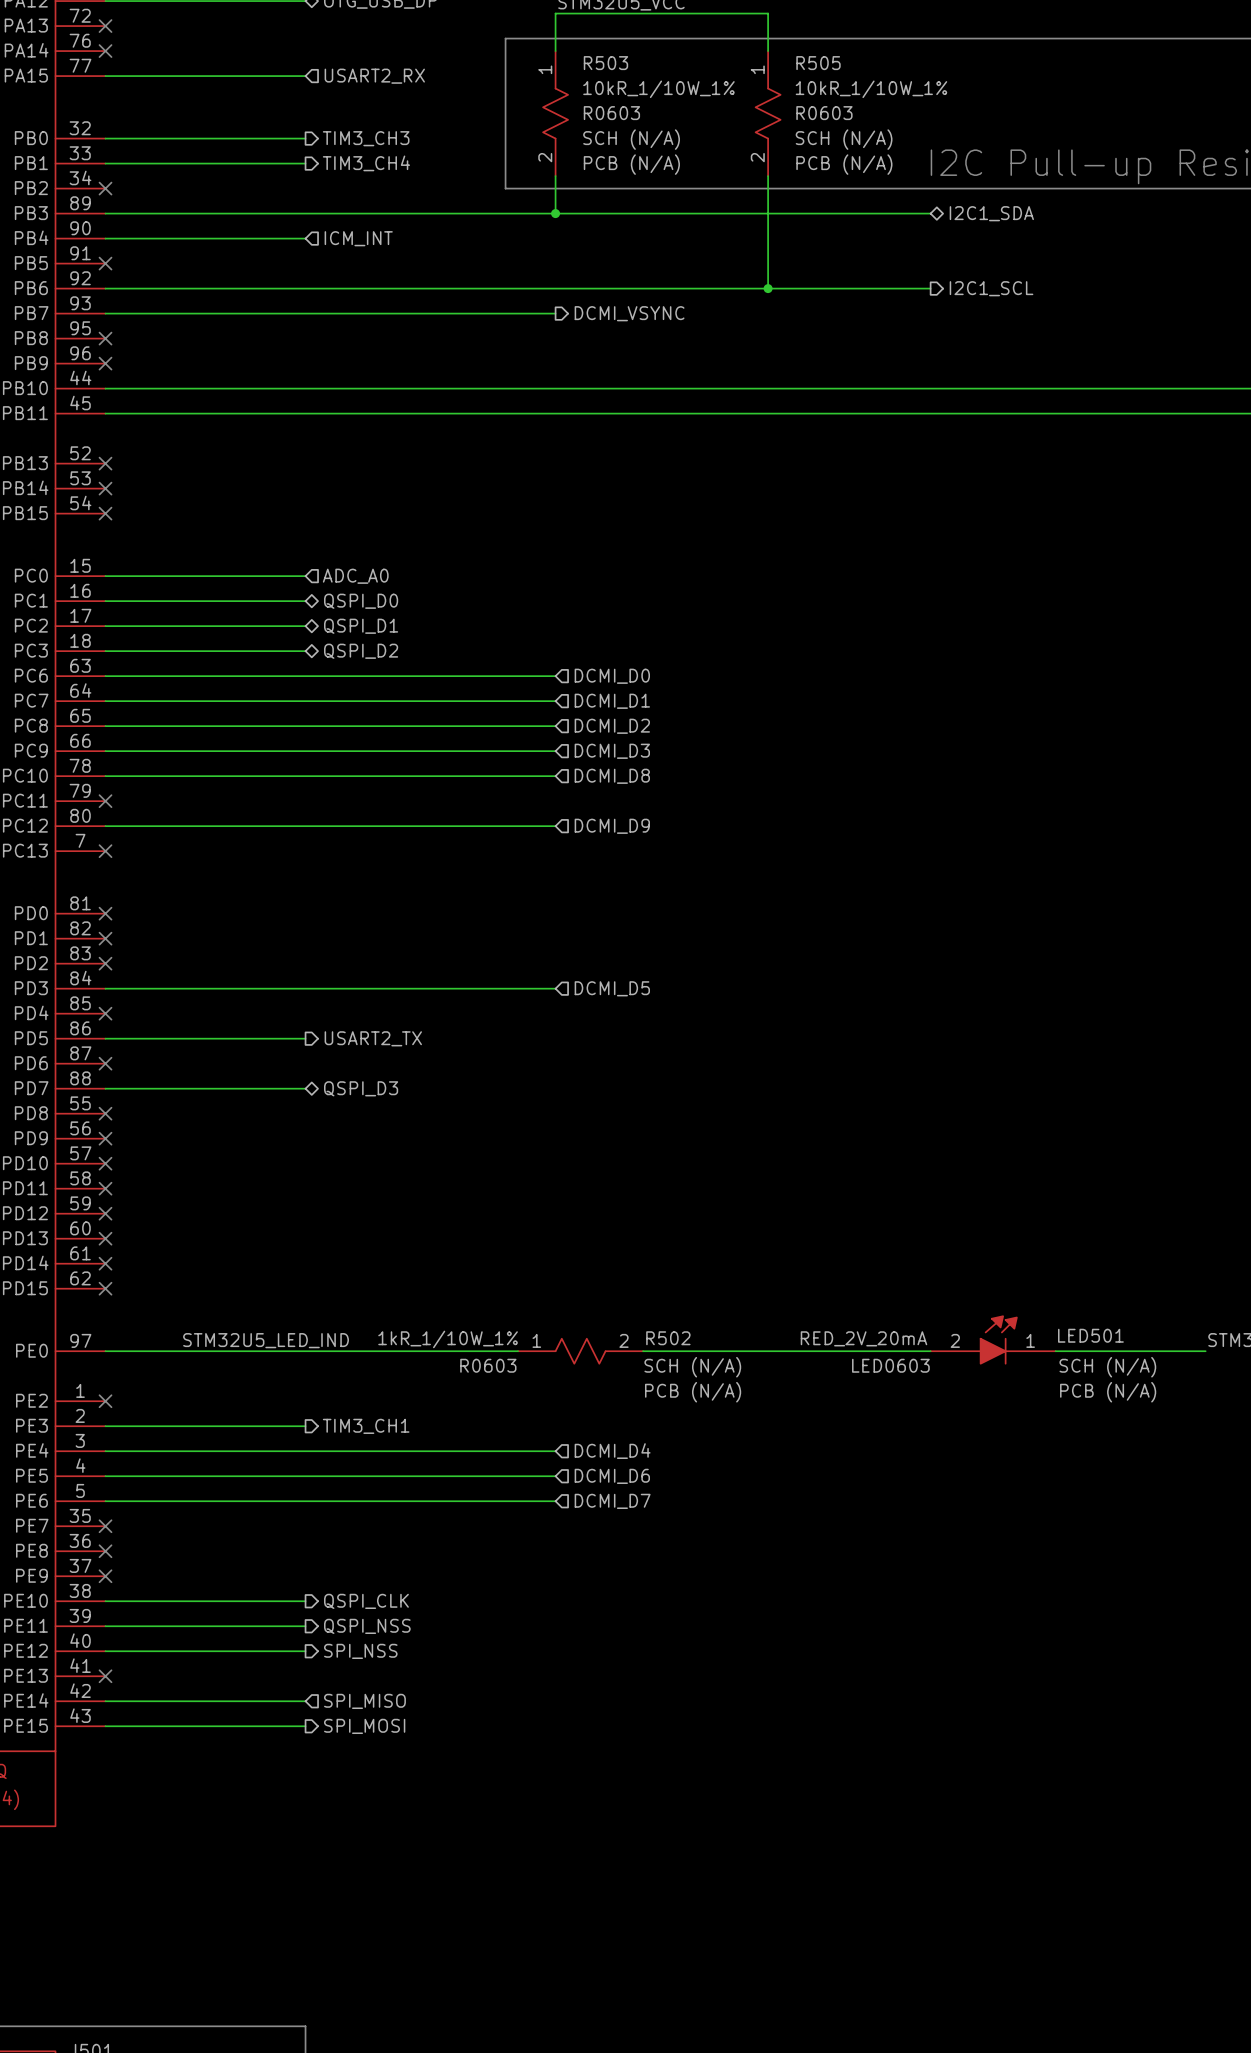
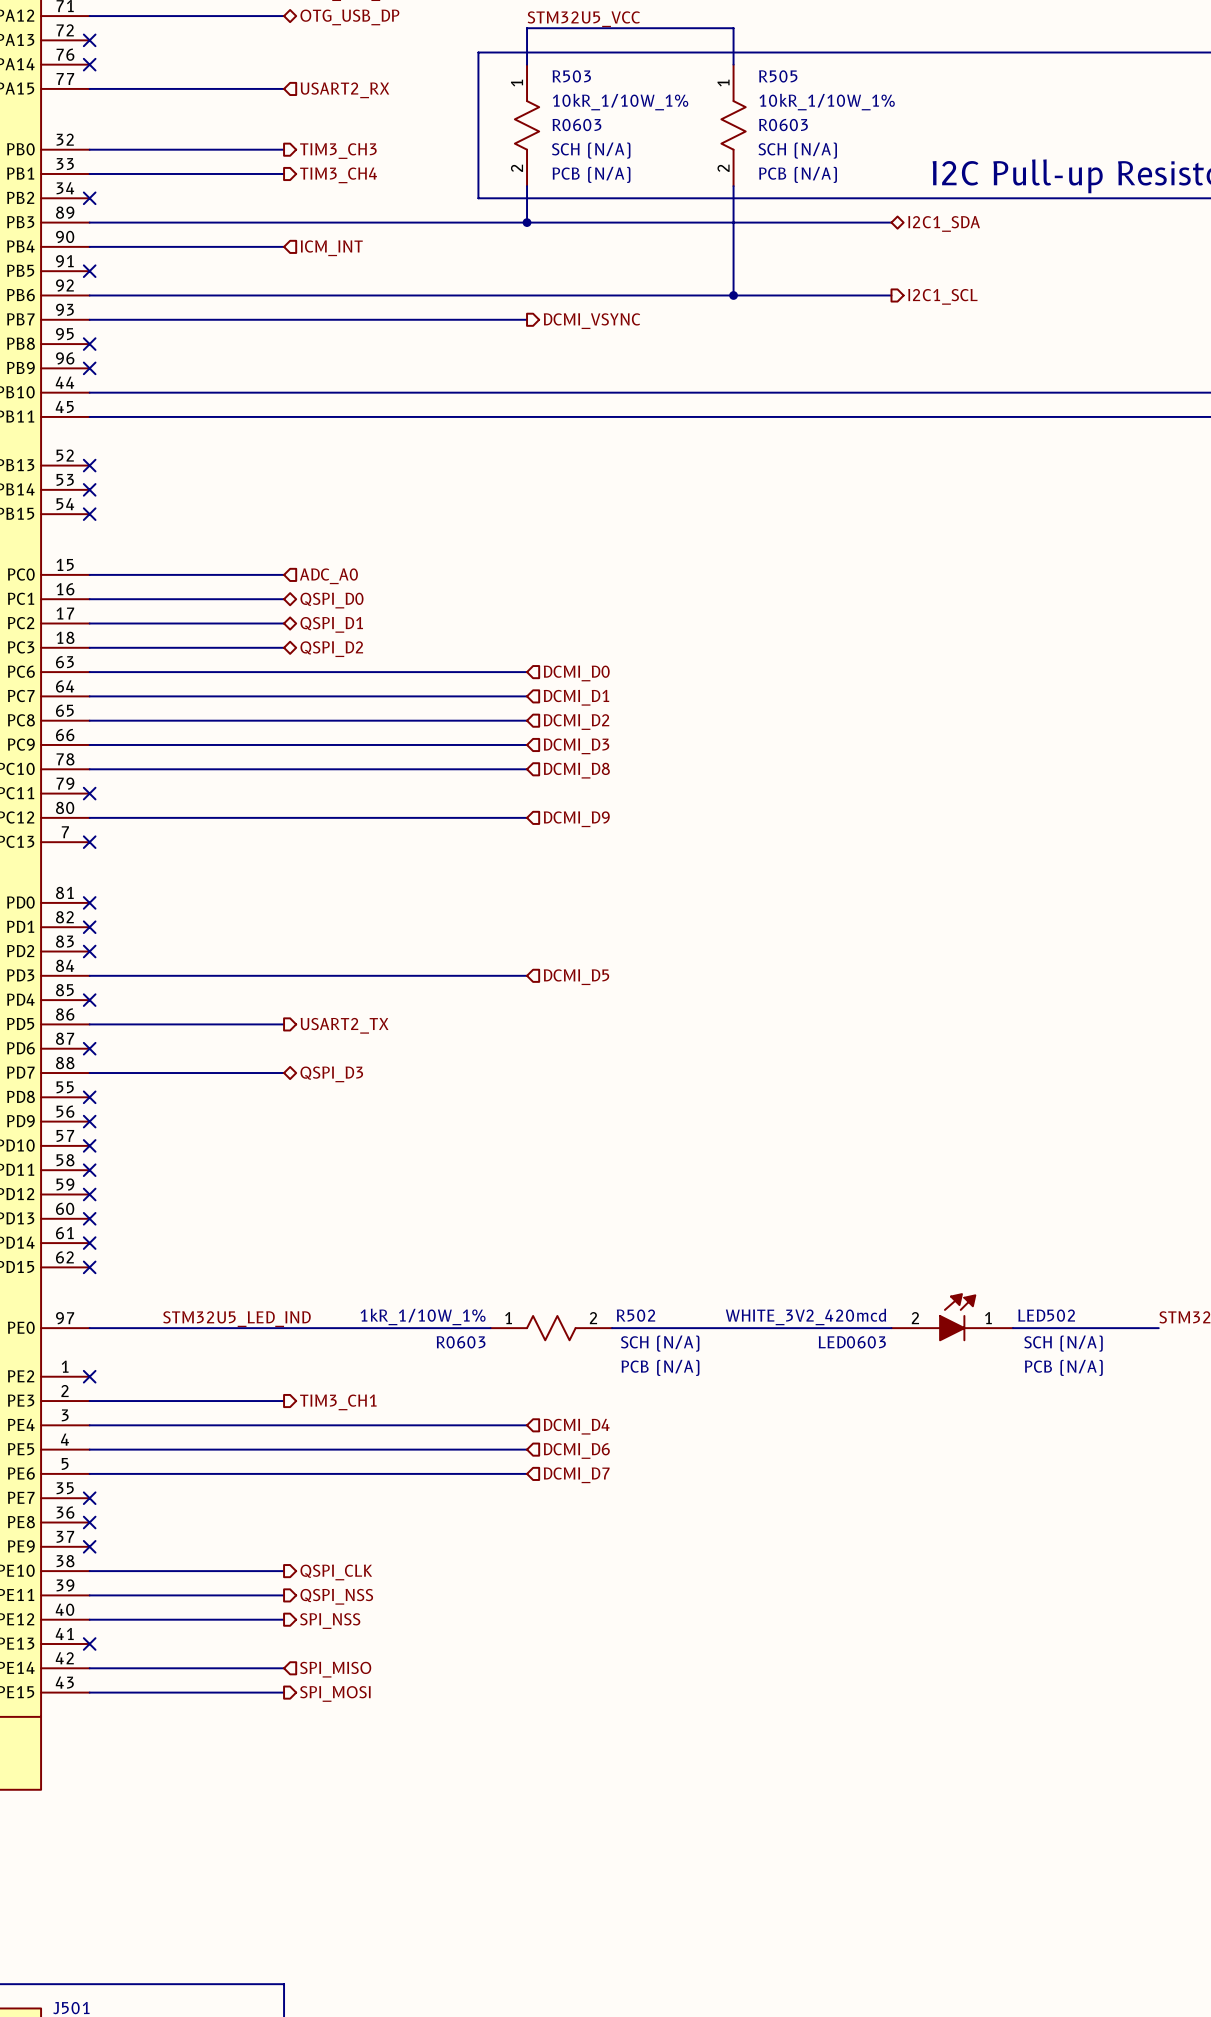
LED501 name: LED501 (1090, 1335) -> LED502 (1046, 1315)
LED501 value: RED_2V_20mA (863, 1338) -> WHITE_3V2_420mcd (805, 1316)

